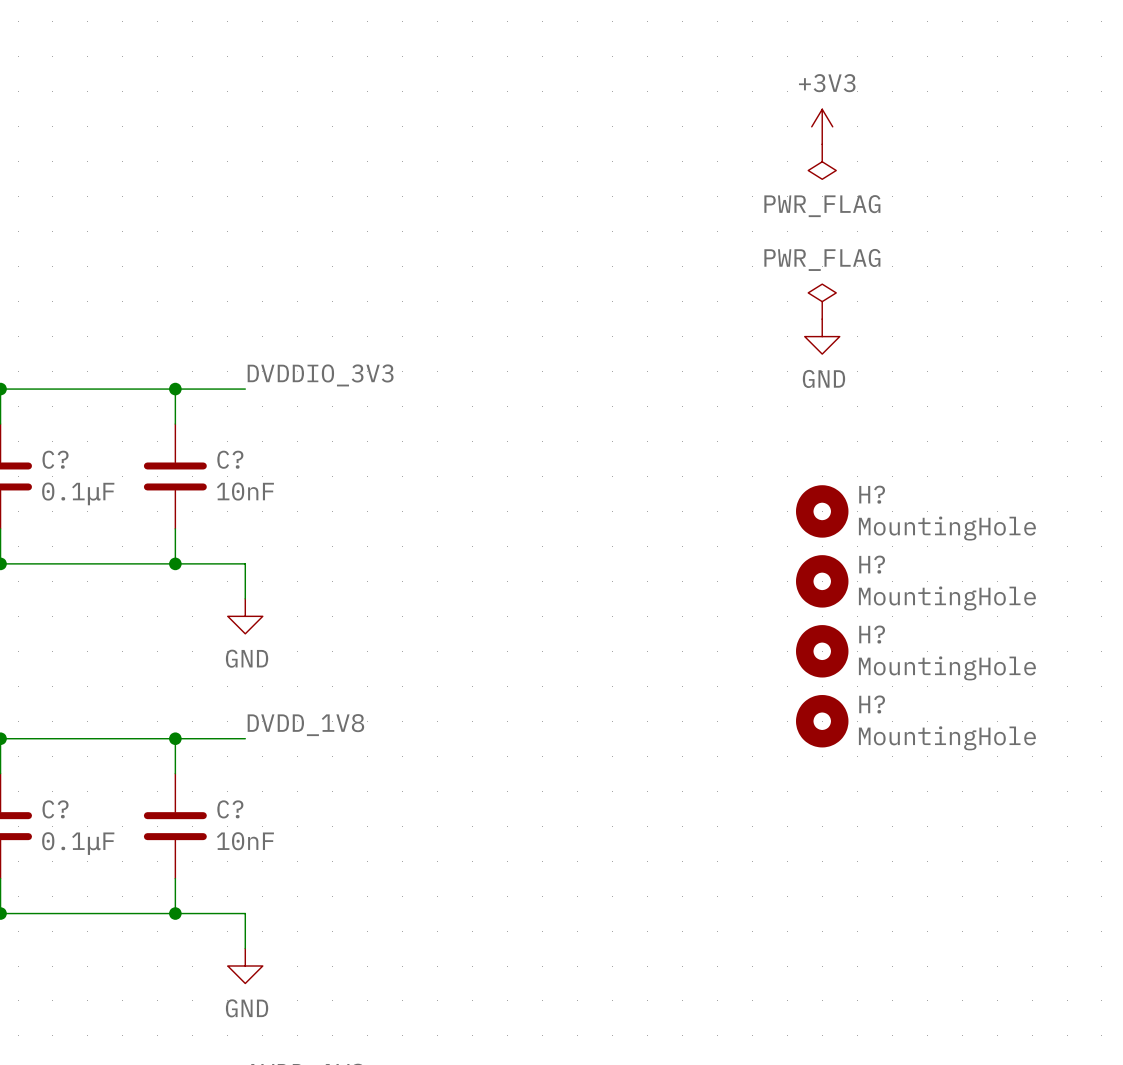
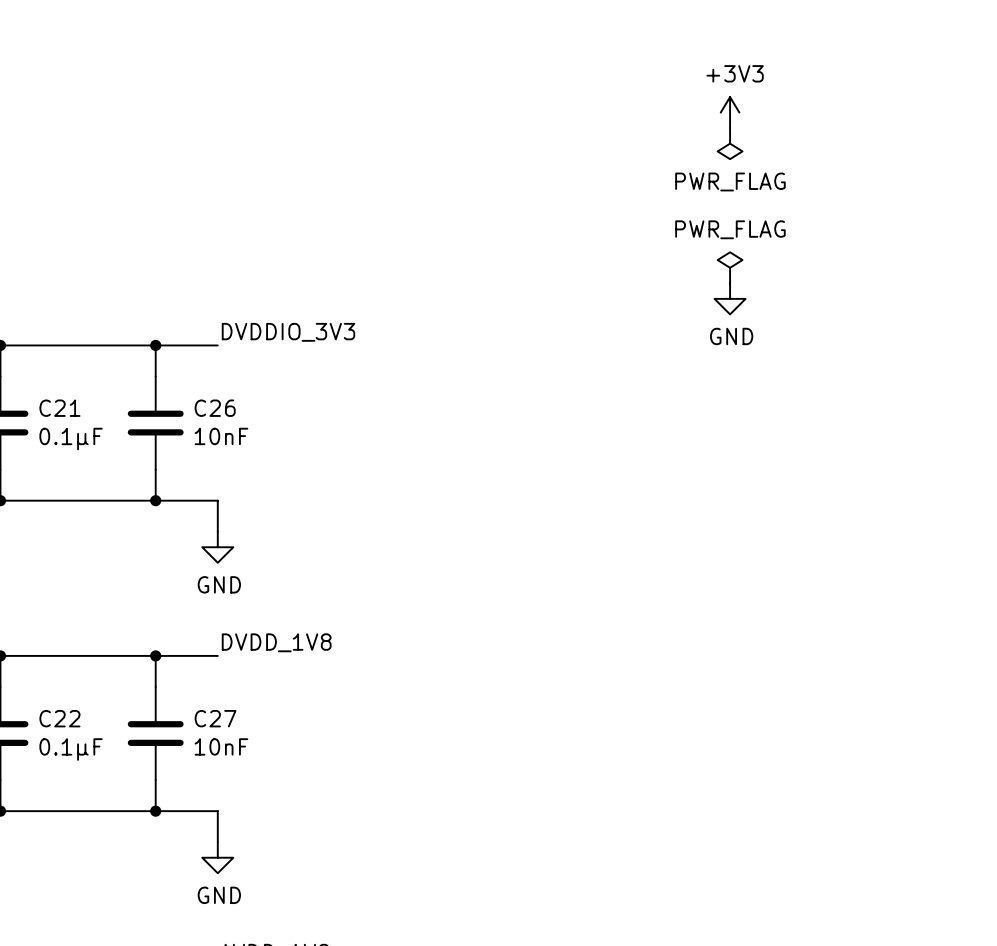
C? name: C? (55, 459) -> C21 (59, 408)
C? name: C? (230, 459) -> C26 (215, 408)
H?: MountingHole (822, 511) -> none
H?: MountingHole (822, 581) -> none
H?: MountingHole (822, 651) -> none
H?: MountingHole (822, 721) -> none
C? name: C? (55, 809) -> C22 (59, 718)
C? name: C? (230, 809) -> C27 (215, 718)

